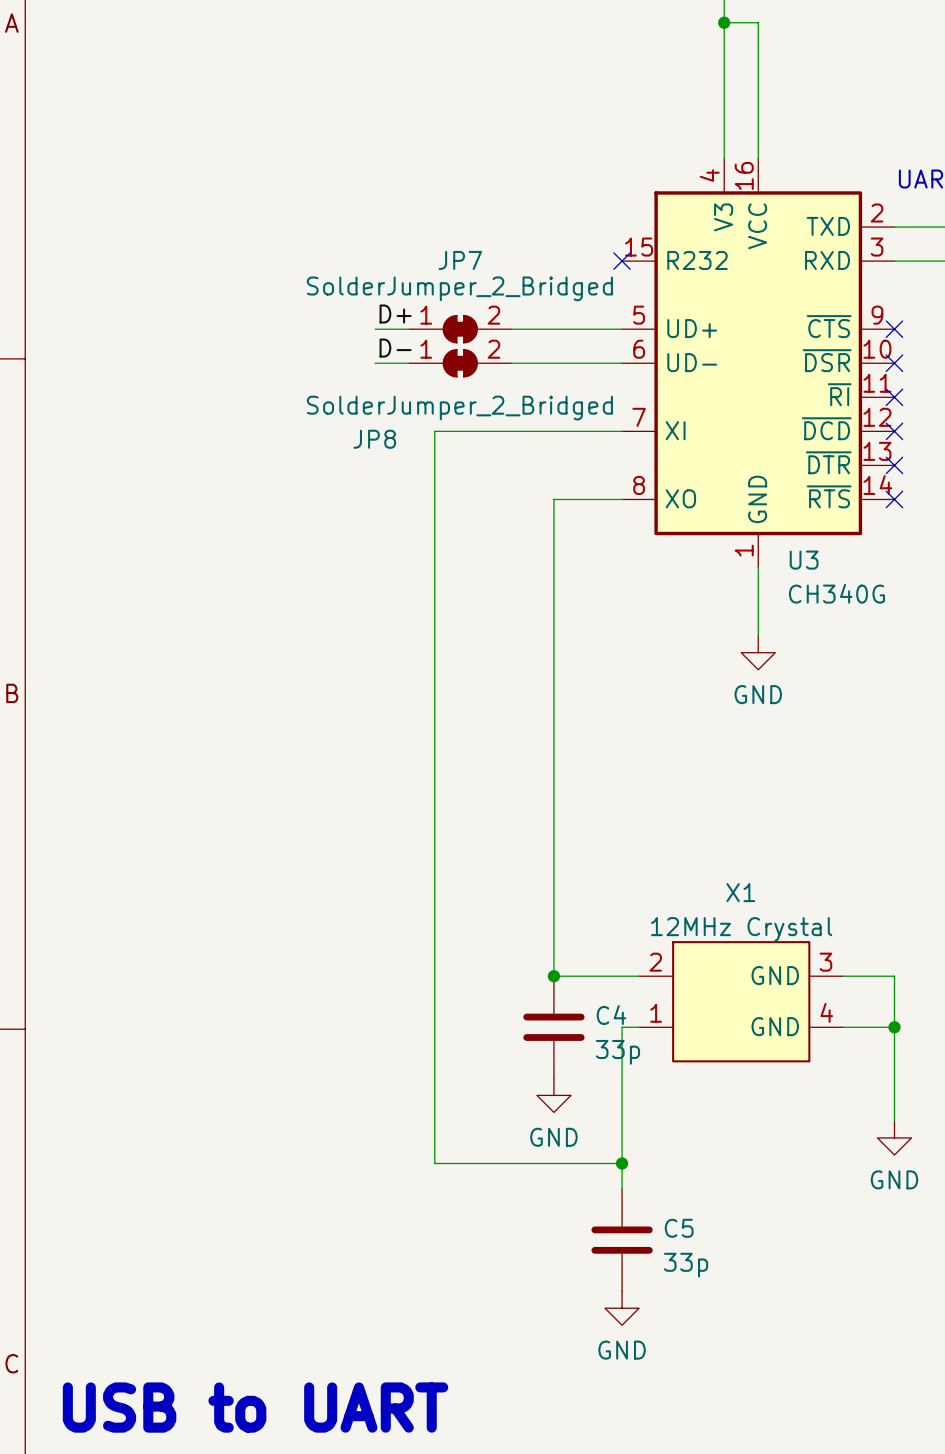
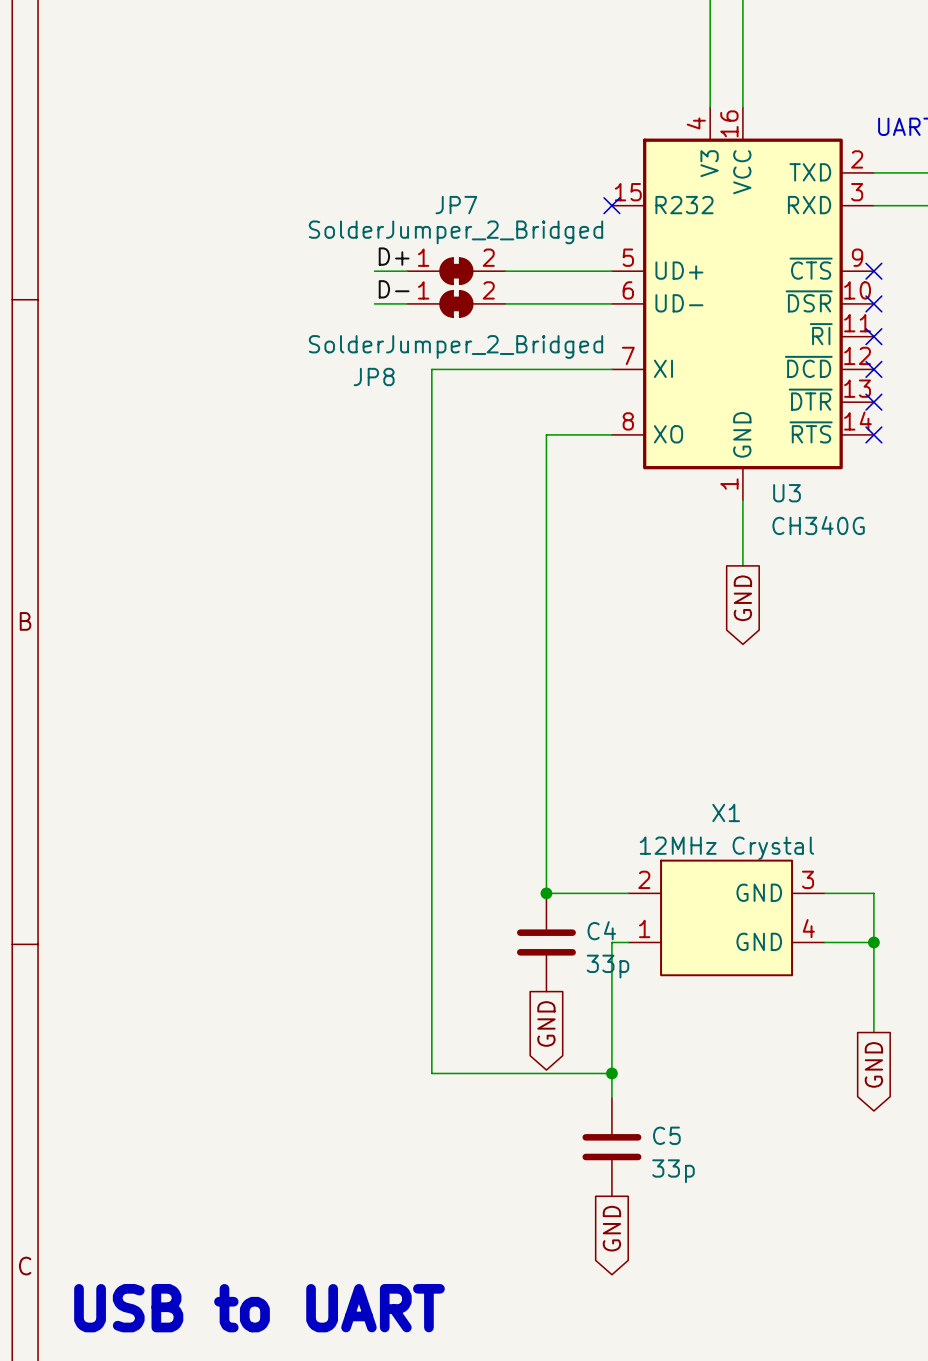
power symbol: GND (758, 652) -> none
global label: none -> GND (742, 598)
power symbol: GND (553, 1095) -> none
global label: none -> GND (546, 1023)
power symbol: GND (894, 1137) -> none
global label: none -> GND (873, 1064)
power symbol: GND (622, 1308) -> none
global label: none -> GND (611, 1228)

